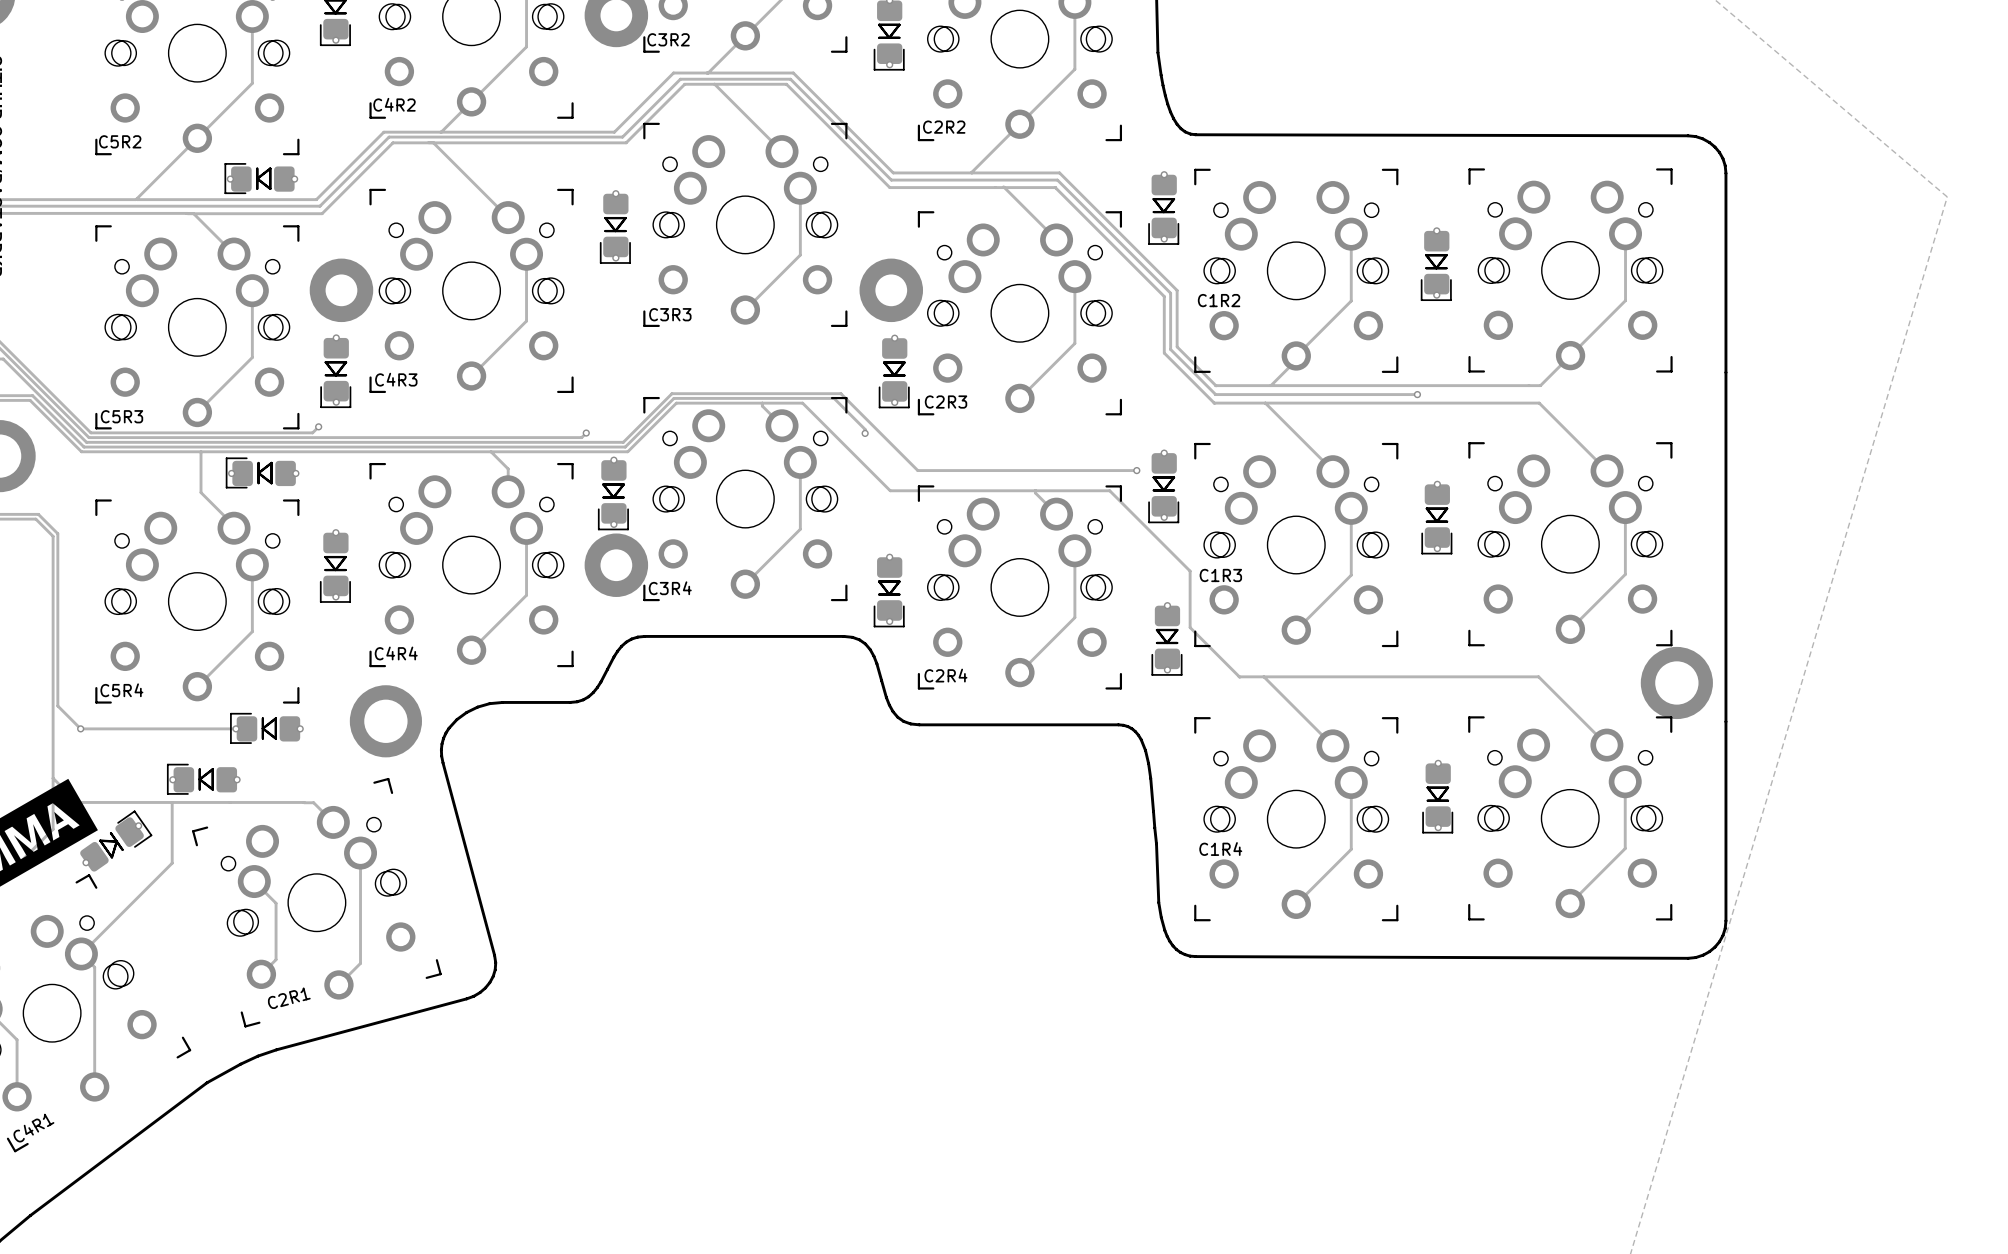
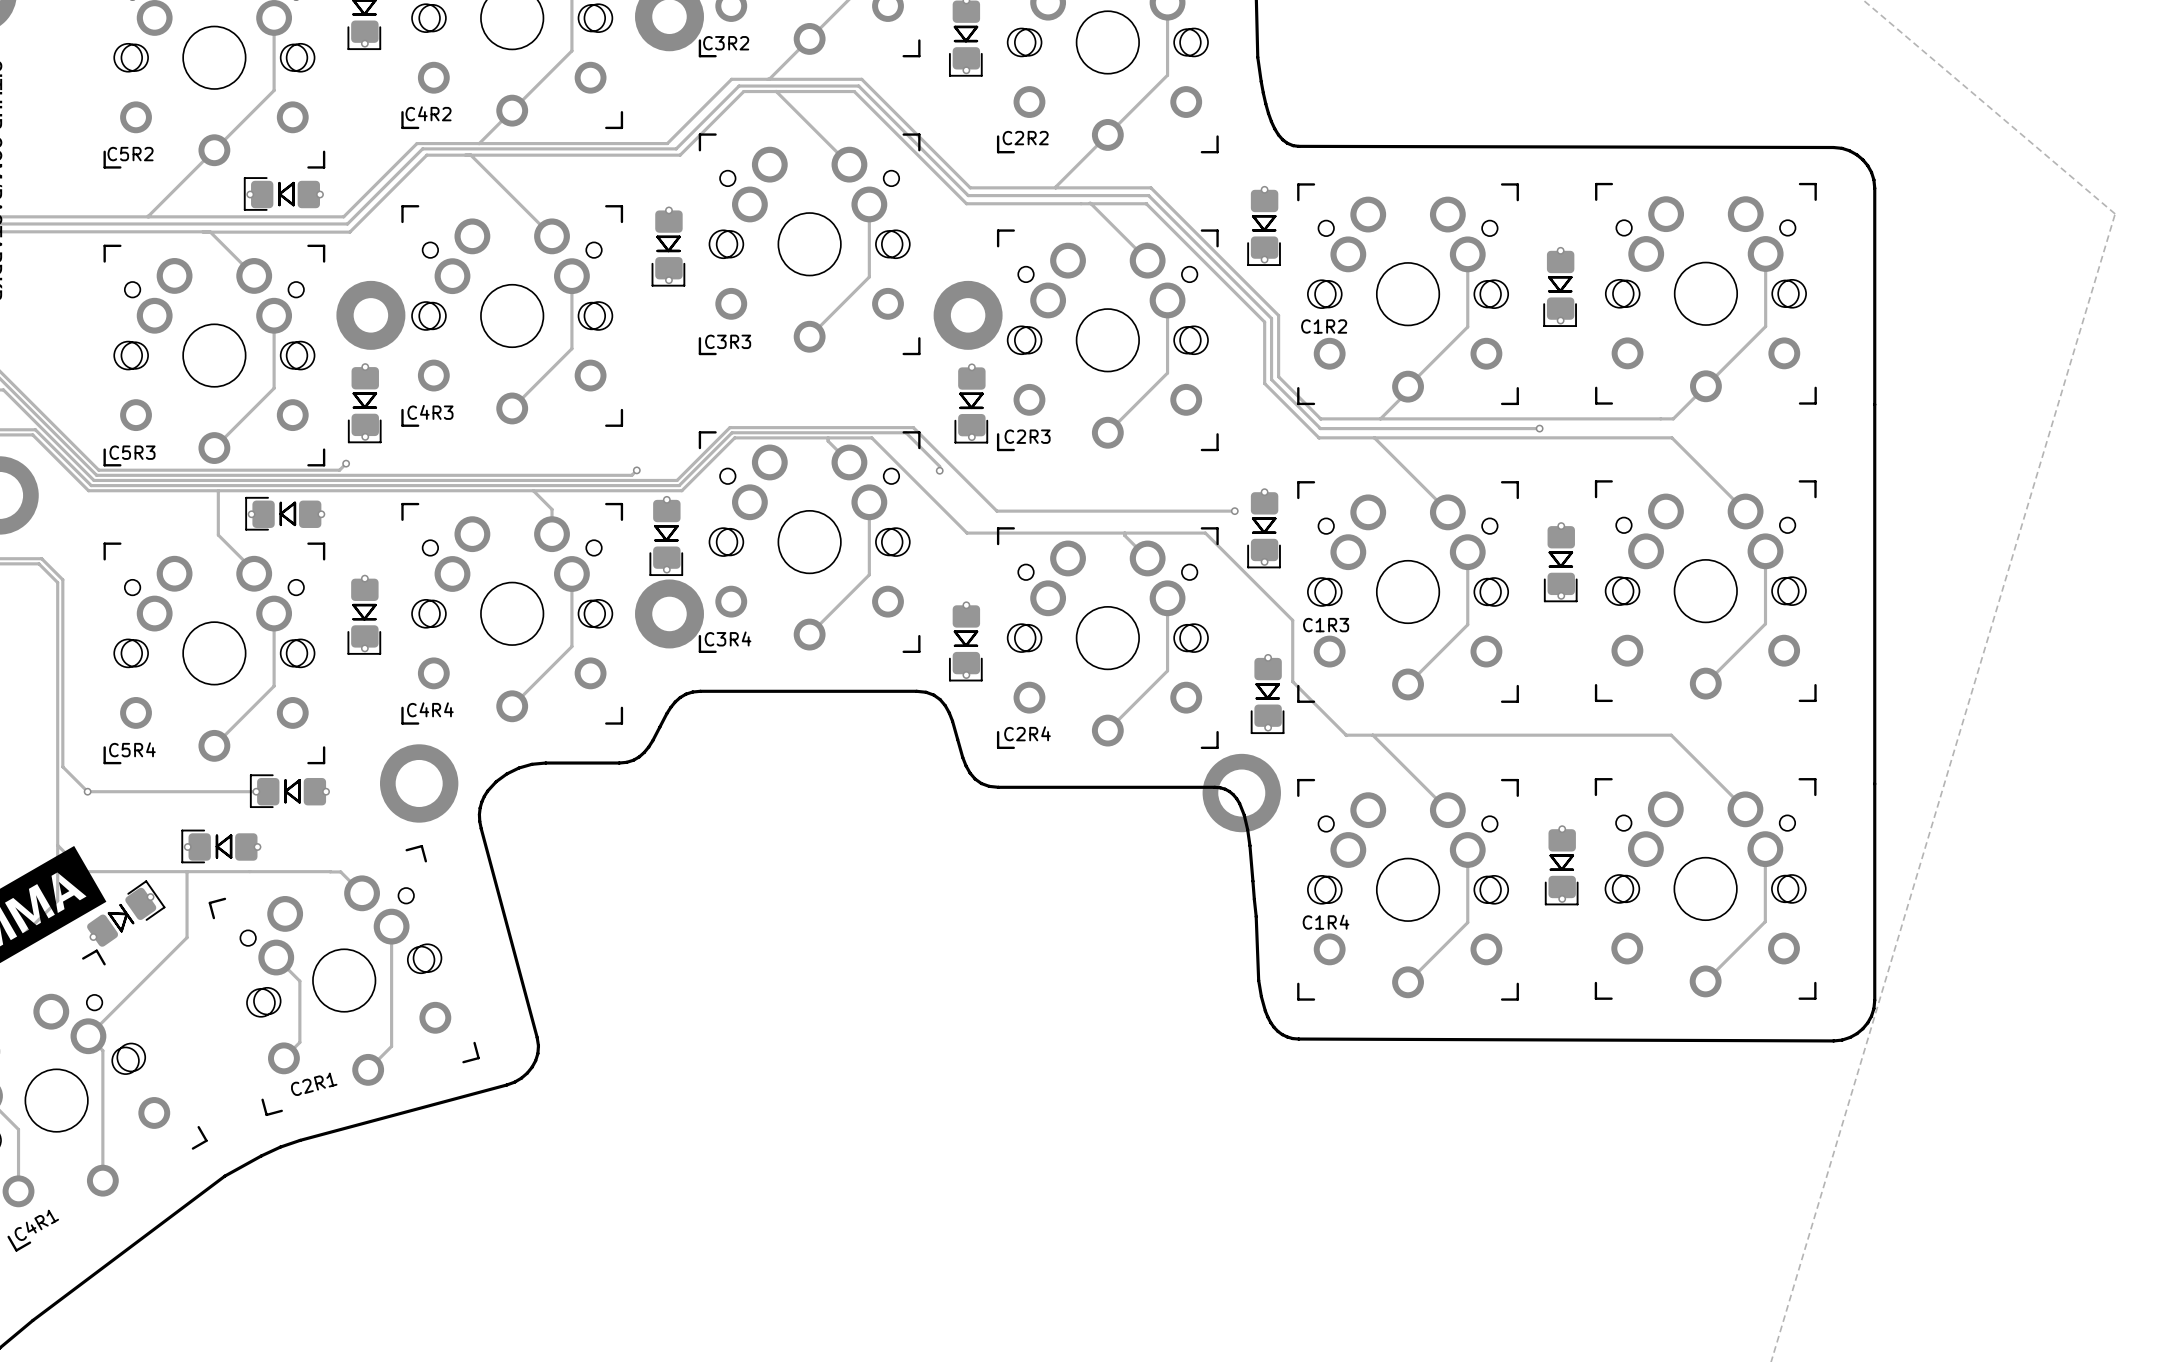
part: (1676, 682) -> none
part: none -> (1241, 793)

